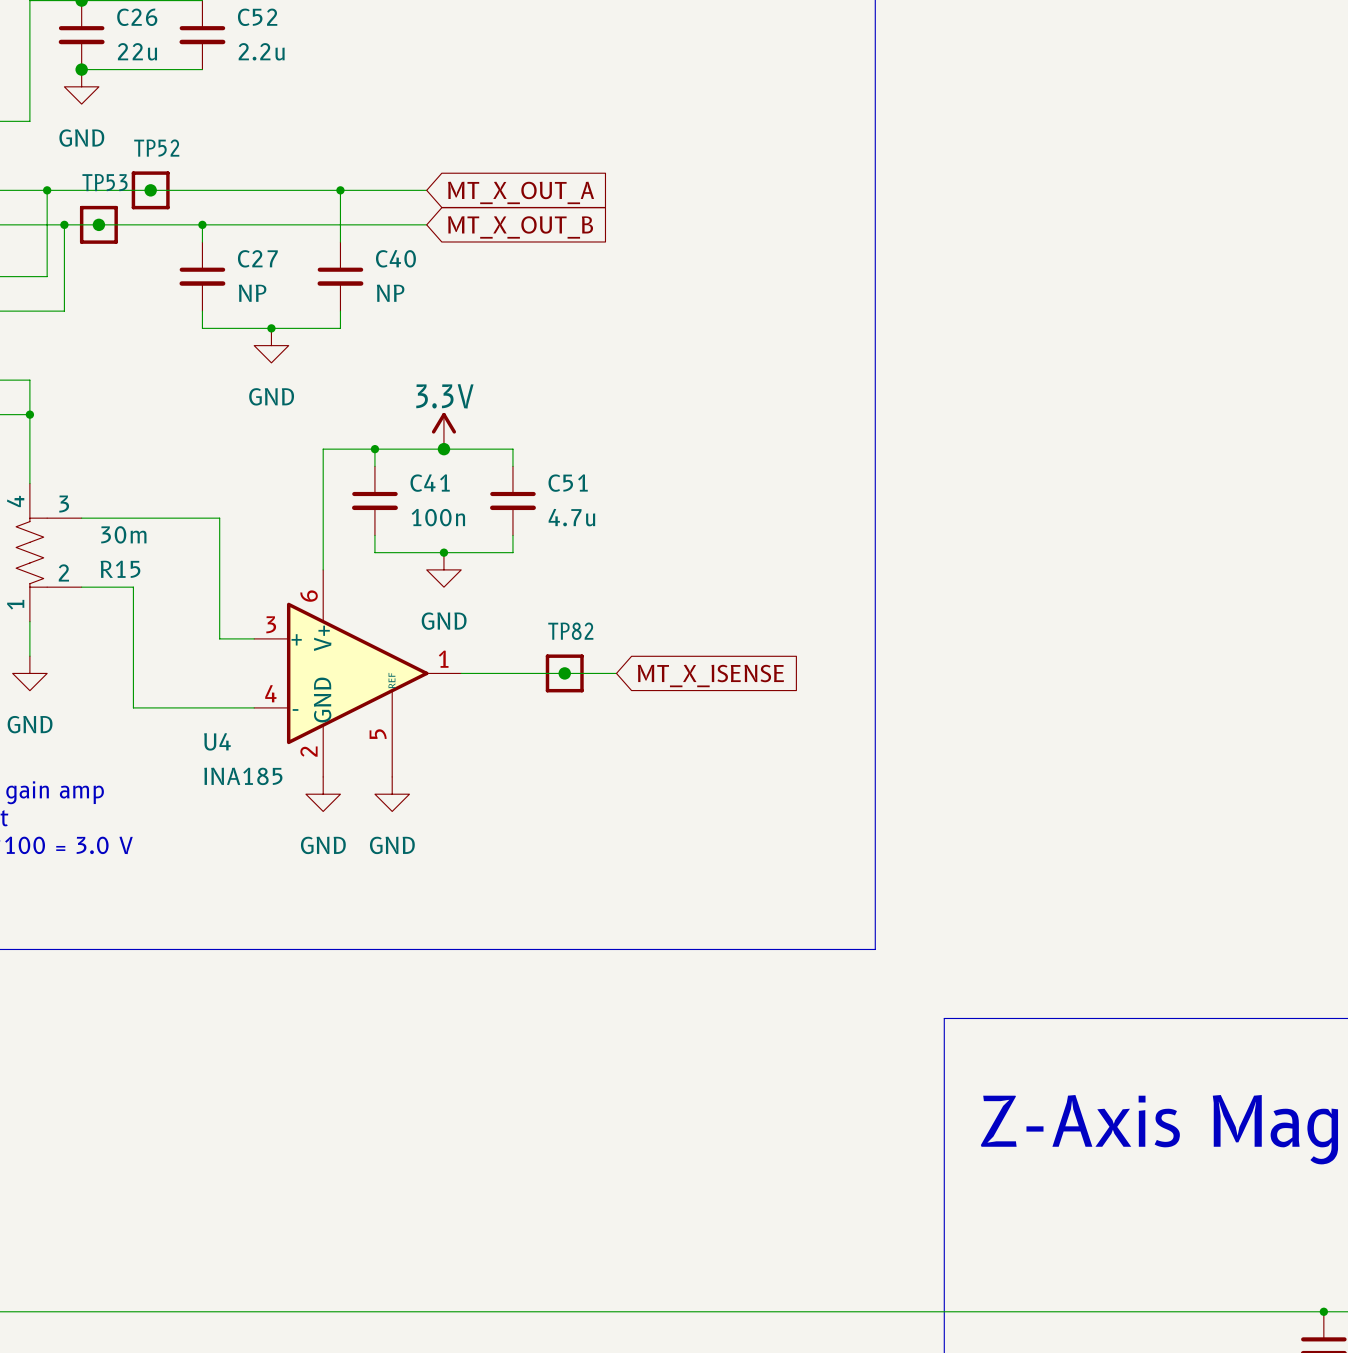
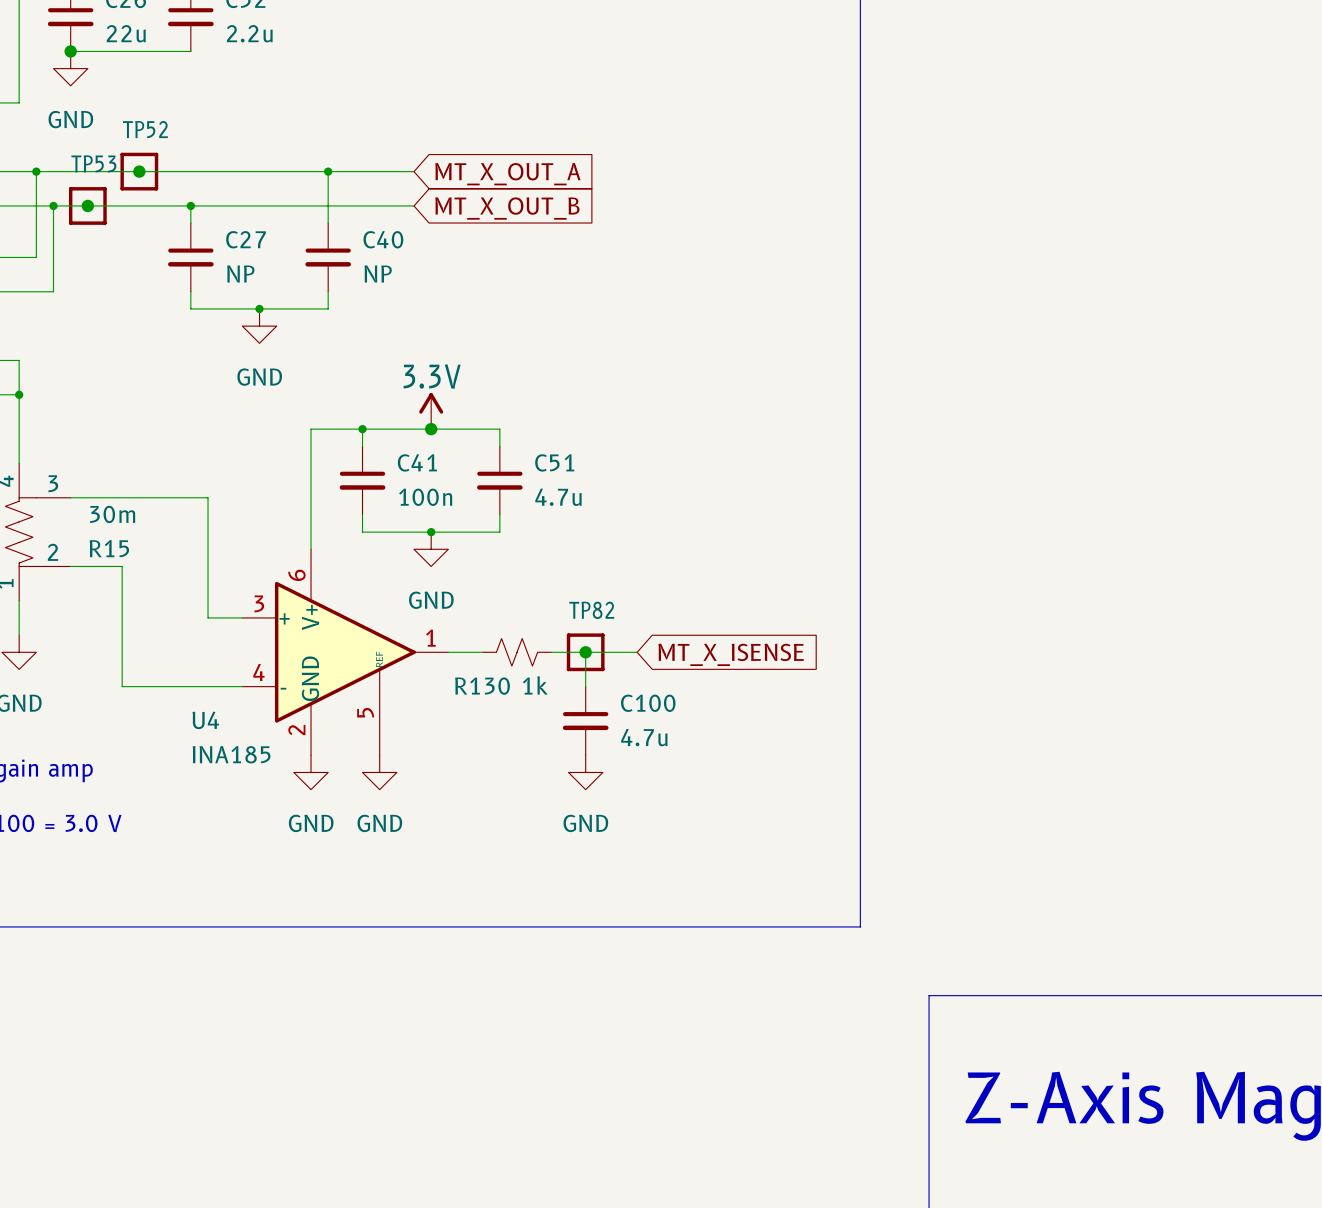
wire: (495, 673) (564, 673) -> none
R130: none -> 1k (517, 652)
junction position: (564, 673) -> (585, 652)
TP82 position: (564, 673) -> (585, 652)
wire: none -> (585, 652) (585, 686)
wire: none -> (602, 652) (637, 652)
global label position: MT_X_ISENSE (710, 676) -> MT_X_ISENSE (731, 654)
C100: none -> 4.7u (585, 720)
power symbol: none -> GND (585, 772)

